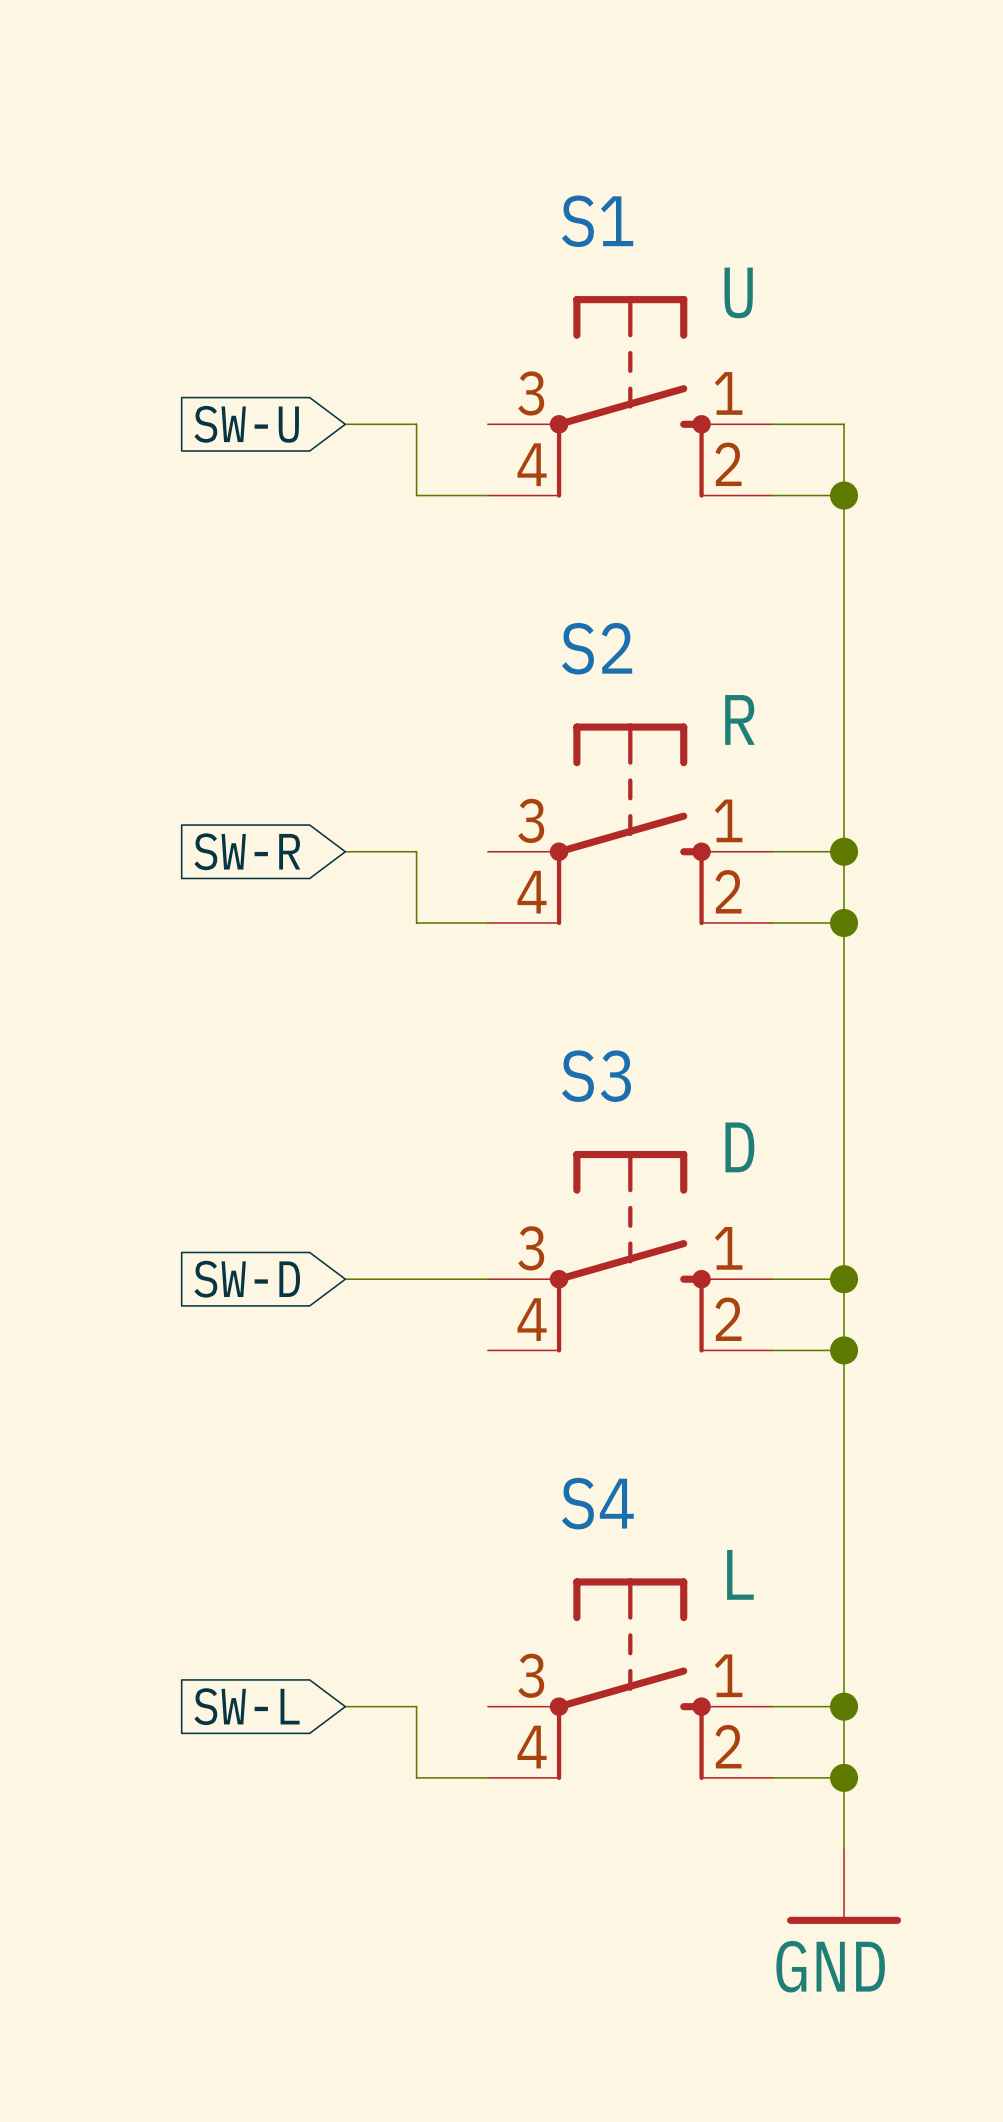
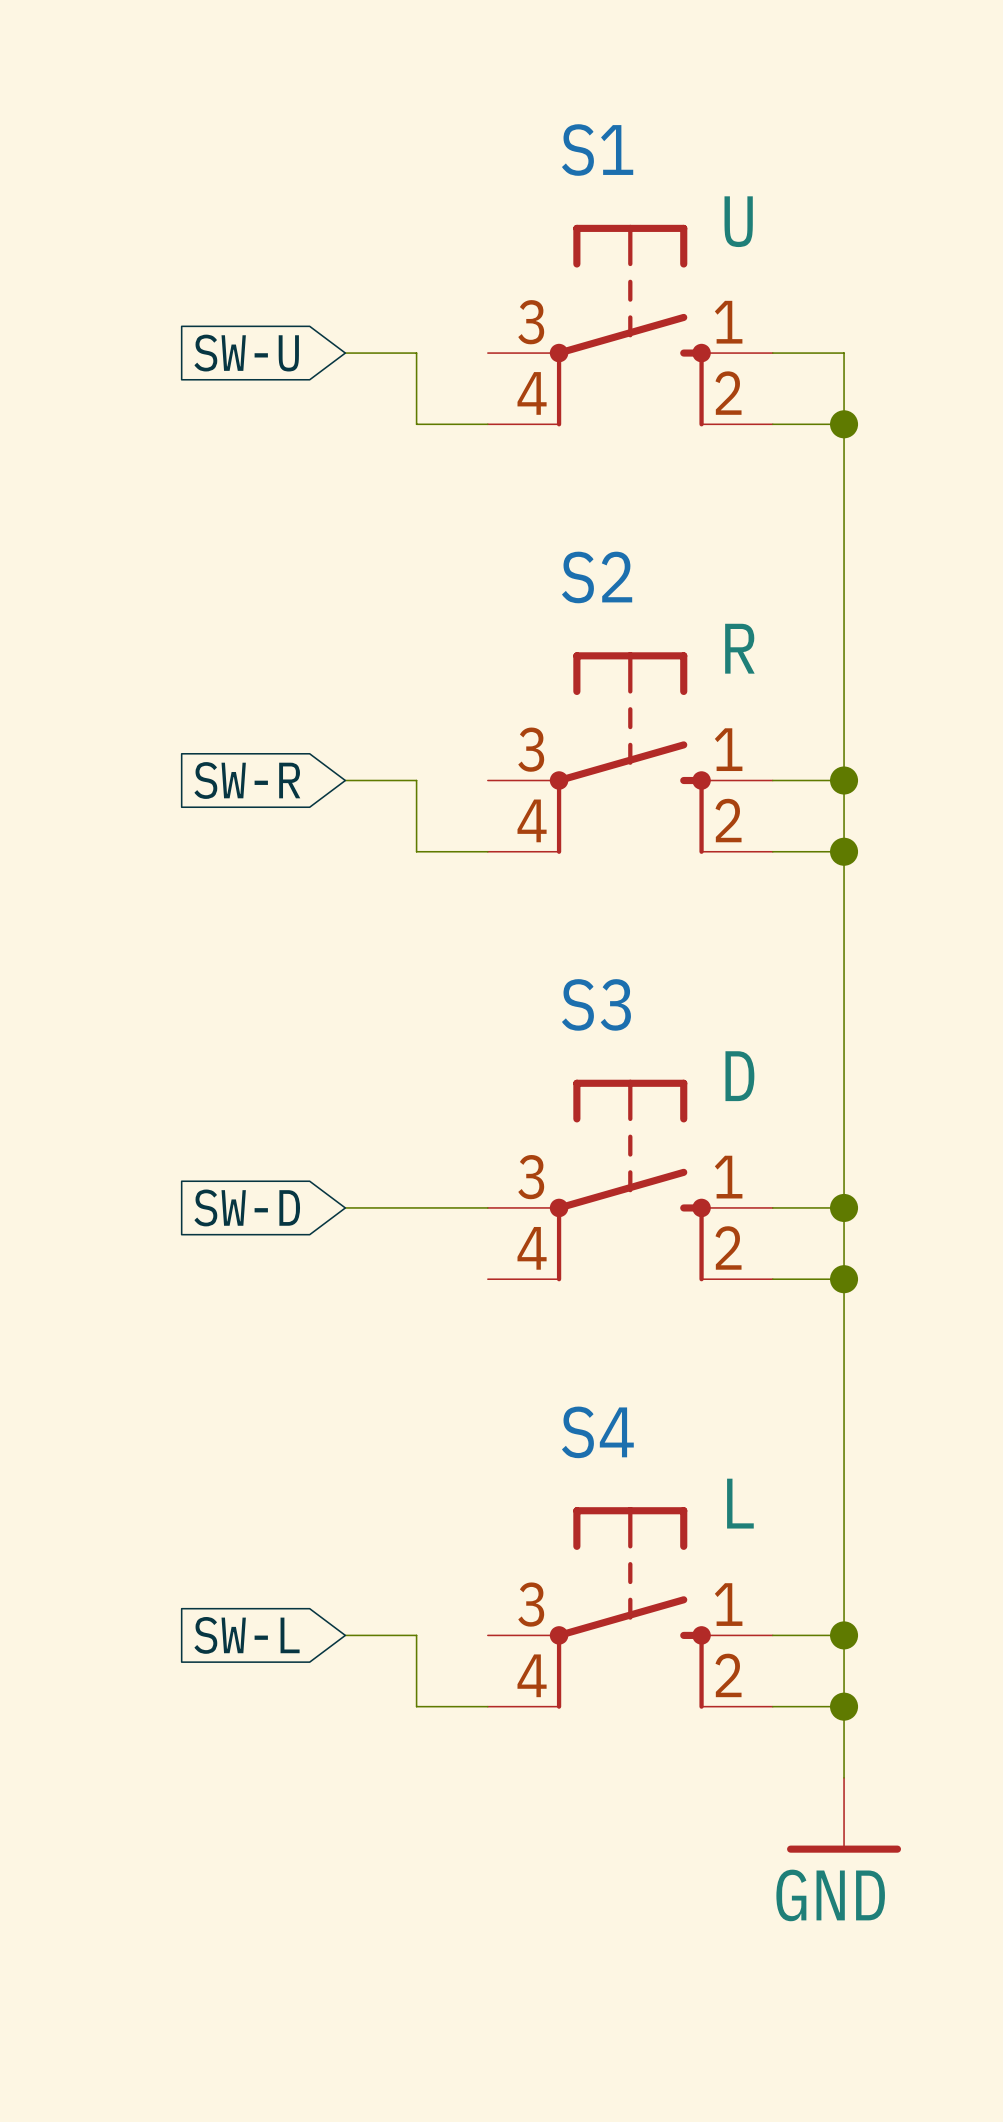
wire: none -> (772, 353) (844, 353) (844, 424)
S1 position: (630, 396) -> (630, 325)
global label position: SW-U (246, 424) -> SW-U (246, 353)
wire: (345, 424) (416, 424) (416, 495) (487, 495) -> (345, 353) (416, 353) (416, 424) (487, 424)
wire: (772, 495) (844, 495) -> (772, 780) (844, 780)
junction position: (844, 495) -> (844, 424)
junction: none -> (844, 780)
S2 position: (630, 824) -> (630, 753)
global label position: SW-R (247, 851) -> SW-R (247, 780)
wire: (345, 851) (416, 851) (416, 922) (487, 922) -> (345, 780) (416, 780) (416, 851) (487, 851)
wire: (772, 922) (844, 922) -> (772, 1207) (844, 1207)
junction: (844, 922) -> none
junction: none -> (844, 1207)
S3 position: (630, 1251) -> (630, 1180)
global label position: SW-D (247, 1279) -> SW-D (247, 1207)
wire: (345, 1279) (487, 1279) -> (345, 1207) (487, 1207)
wire: (772, 1350) (844, 1350) -> (772, 1635) (844, 1635)
junction: (844, 1350) -> none
junction: none -> (844, 1635)
S4 position: (630, 1679) -> (630, 1607)
global label position: SW-L (247, 1706) -> SW-L (247, 1635)
wire: (345, 1706) (416, 1706) (416, 1777) (487, 1777) -> (345, 1635) (416, 1635) (416, 1706) (487, 1706)
wire: (772, 1777) (844, 1777) (844, 1849) -> none
junction: (844, 1777) -> none
power symbol position: GND (844, 1886) -> GND (844, 1815)

